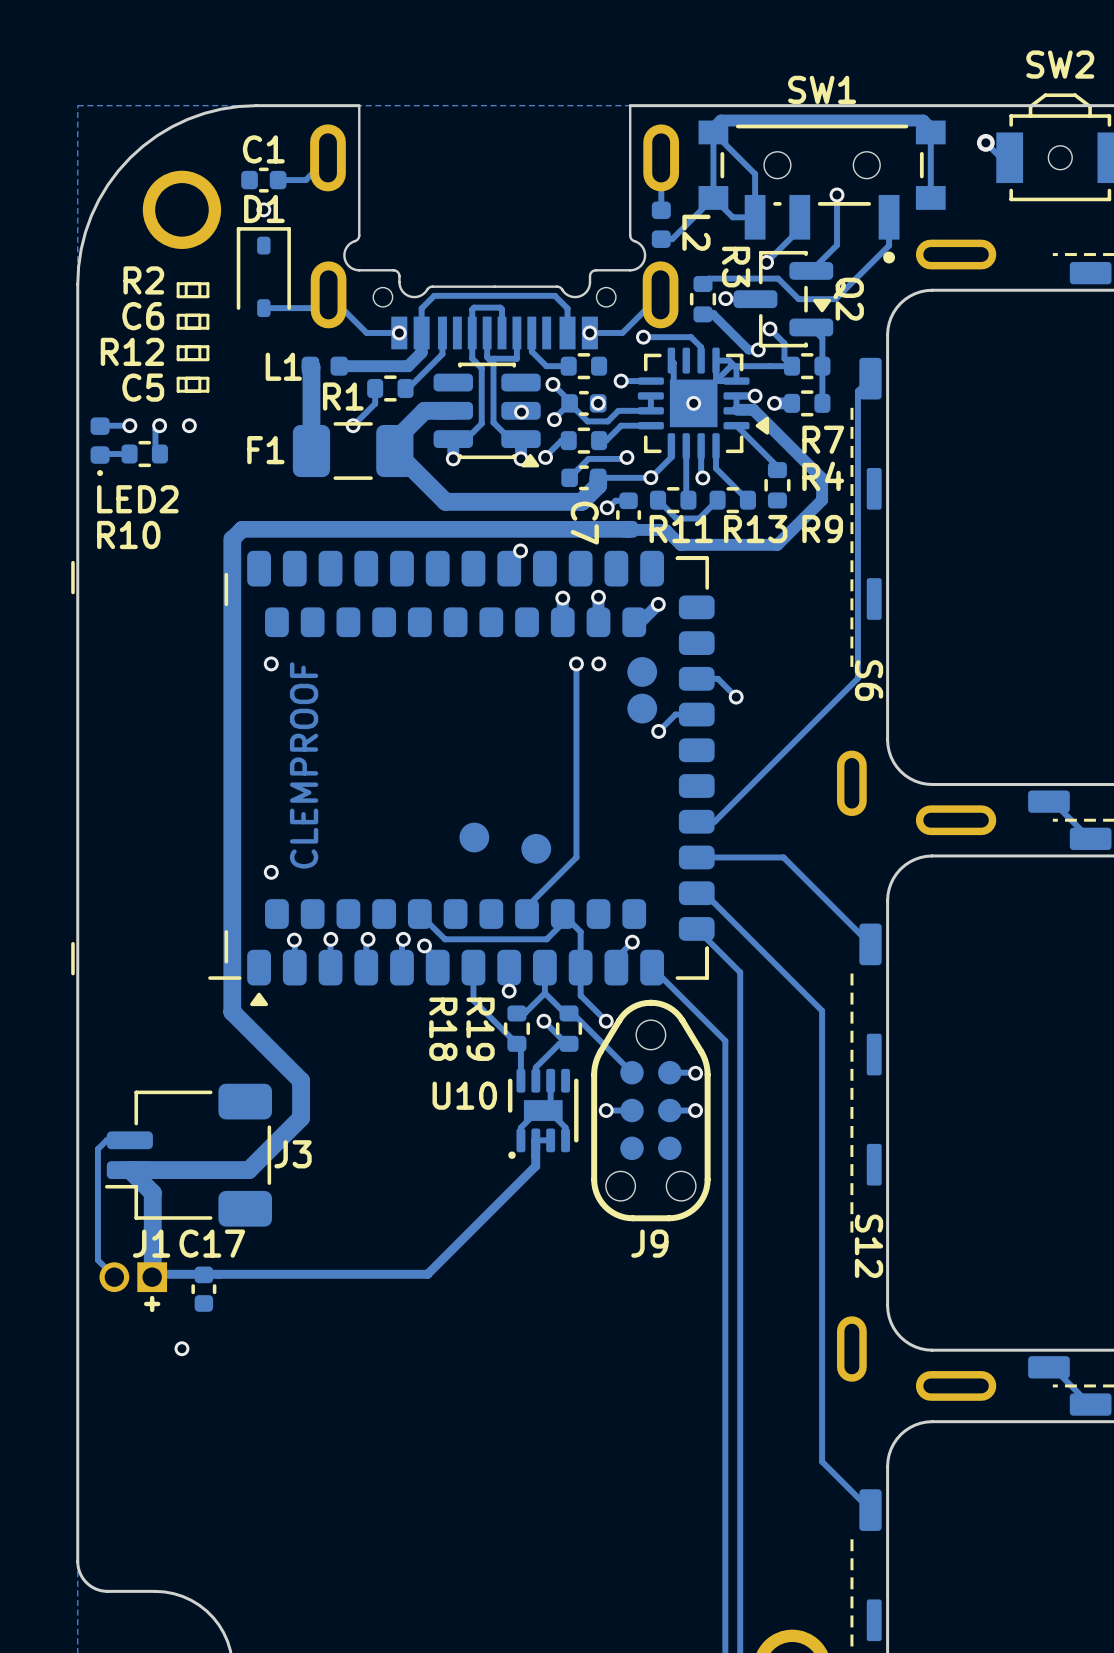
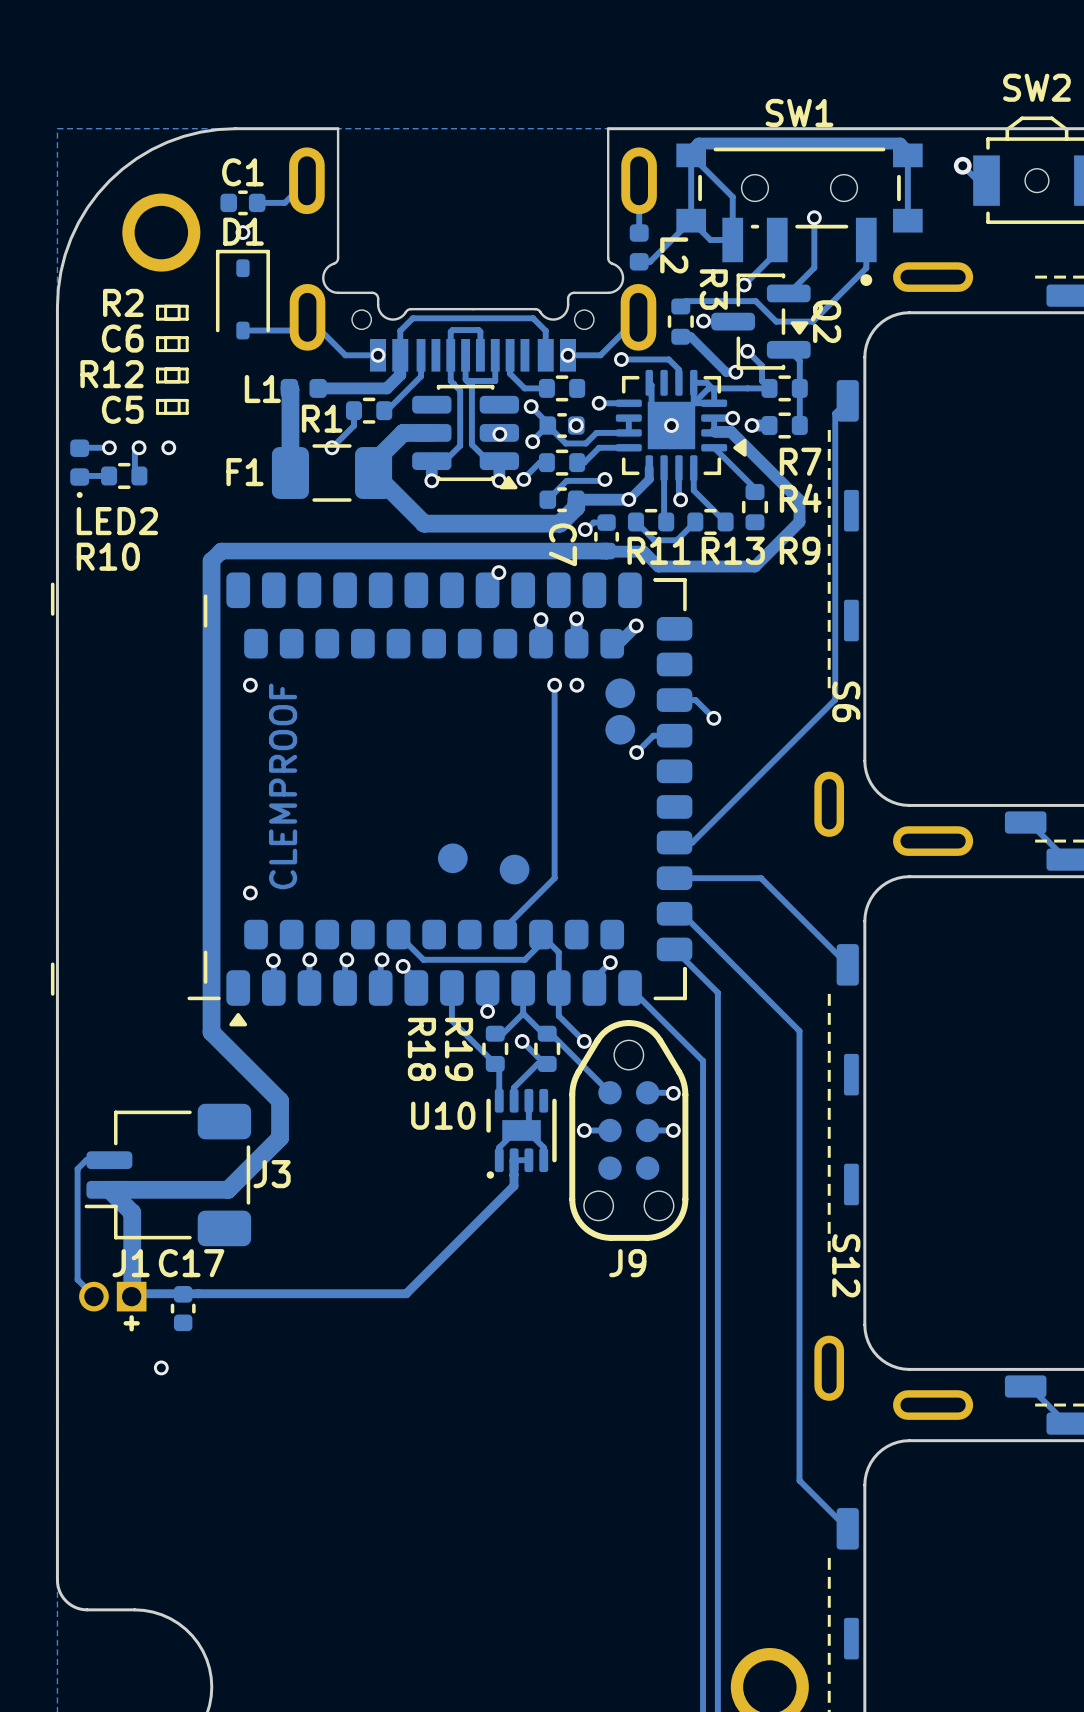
track width: thin (671, 446) (671, 457) (650, 477) (598, 477) -> thick (649, 468) (649, 479) (628, 499) (576, 499)

